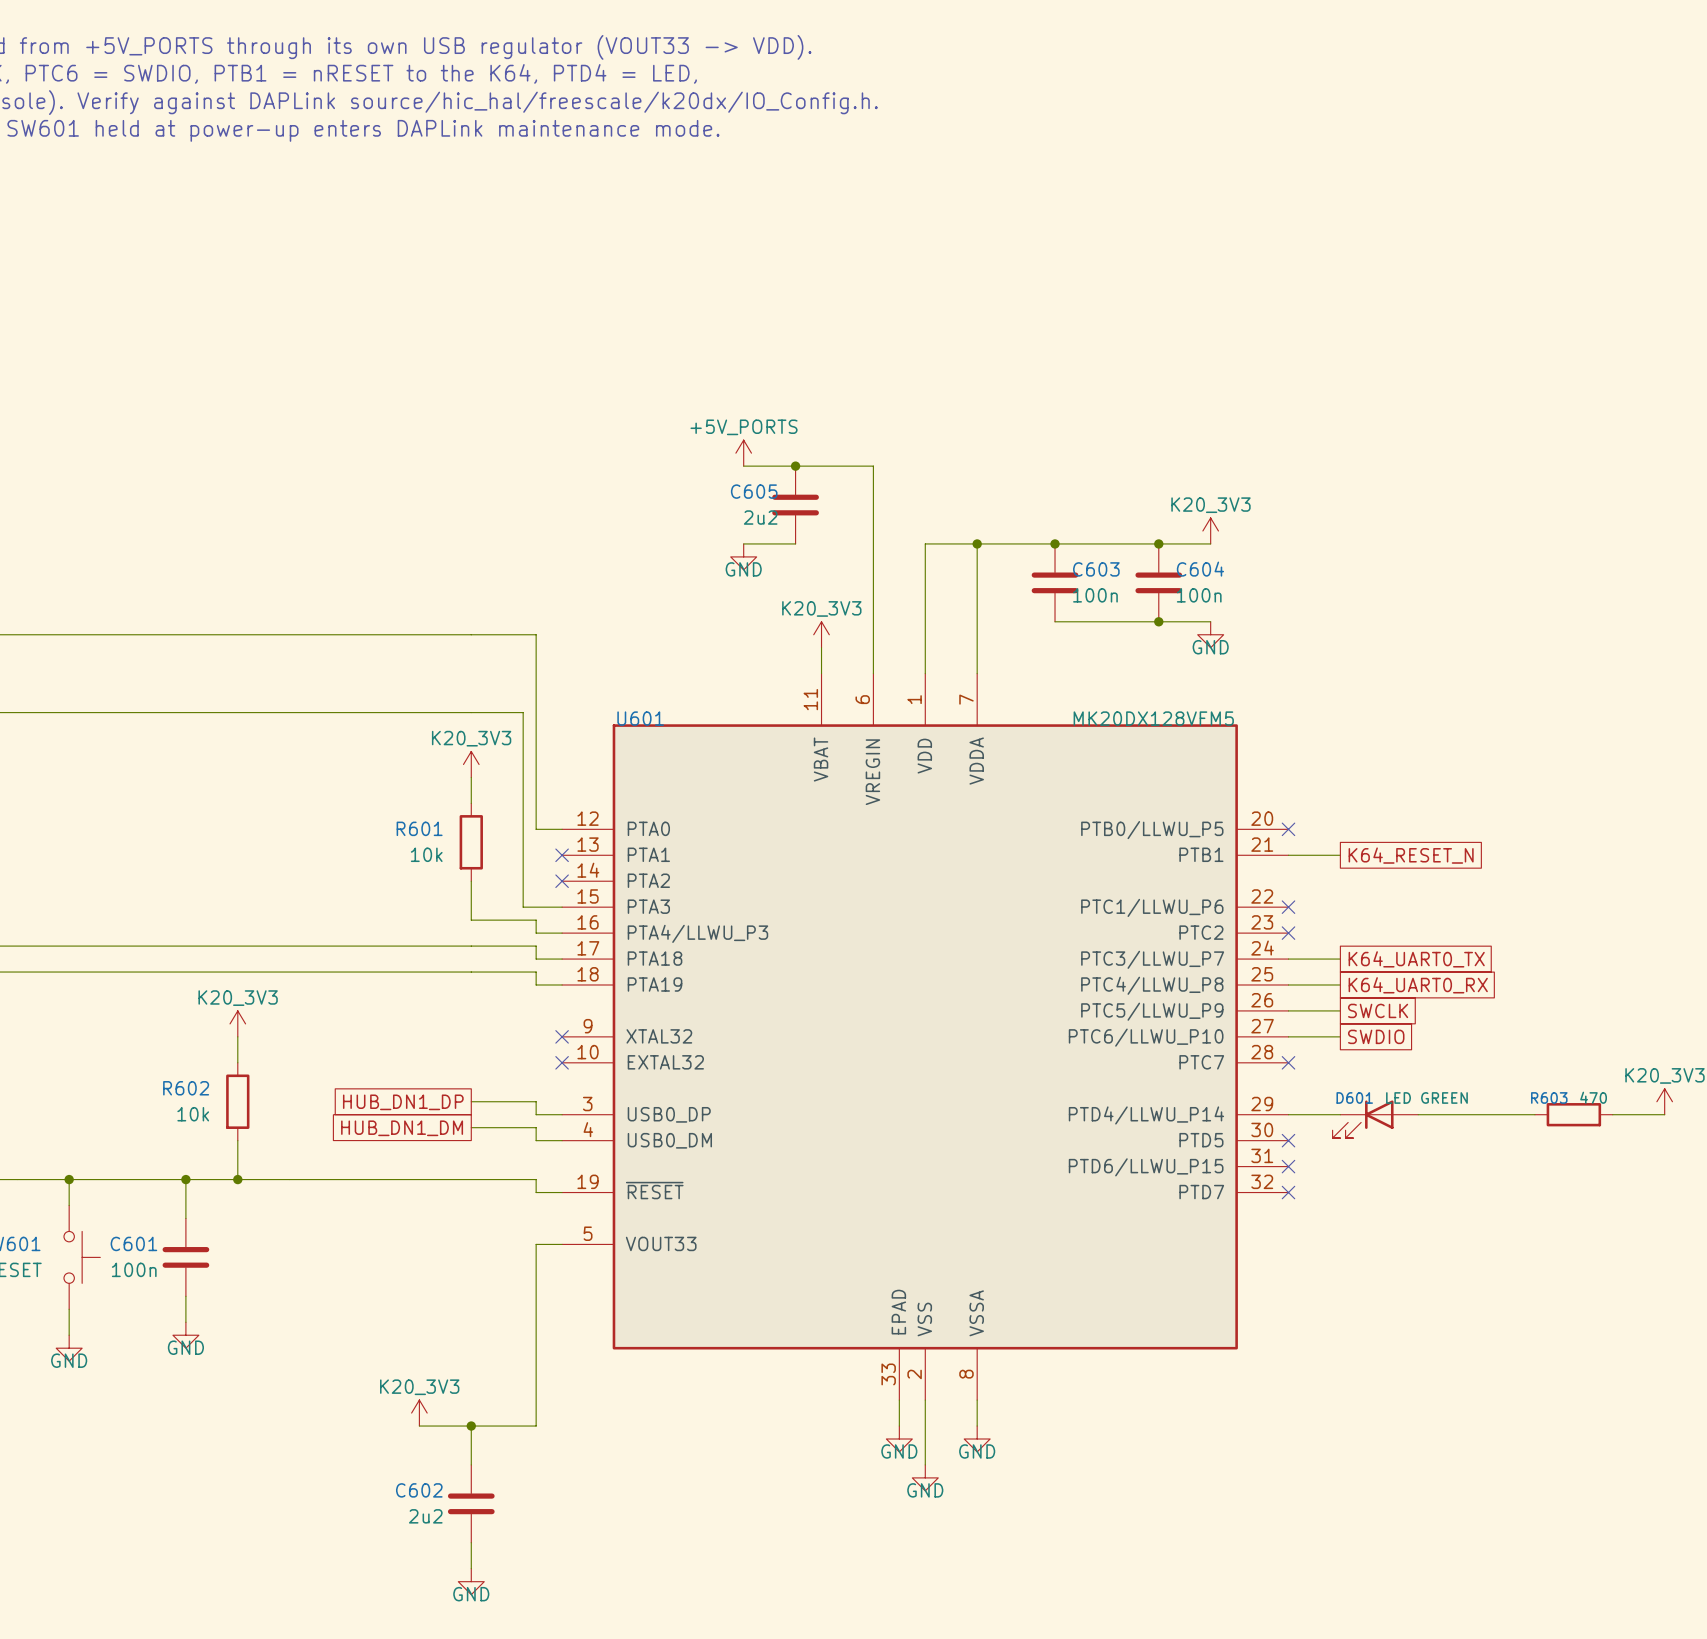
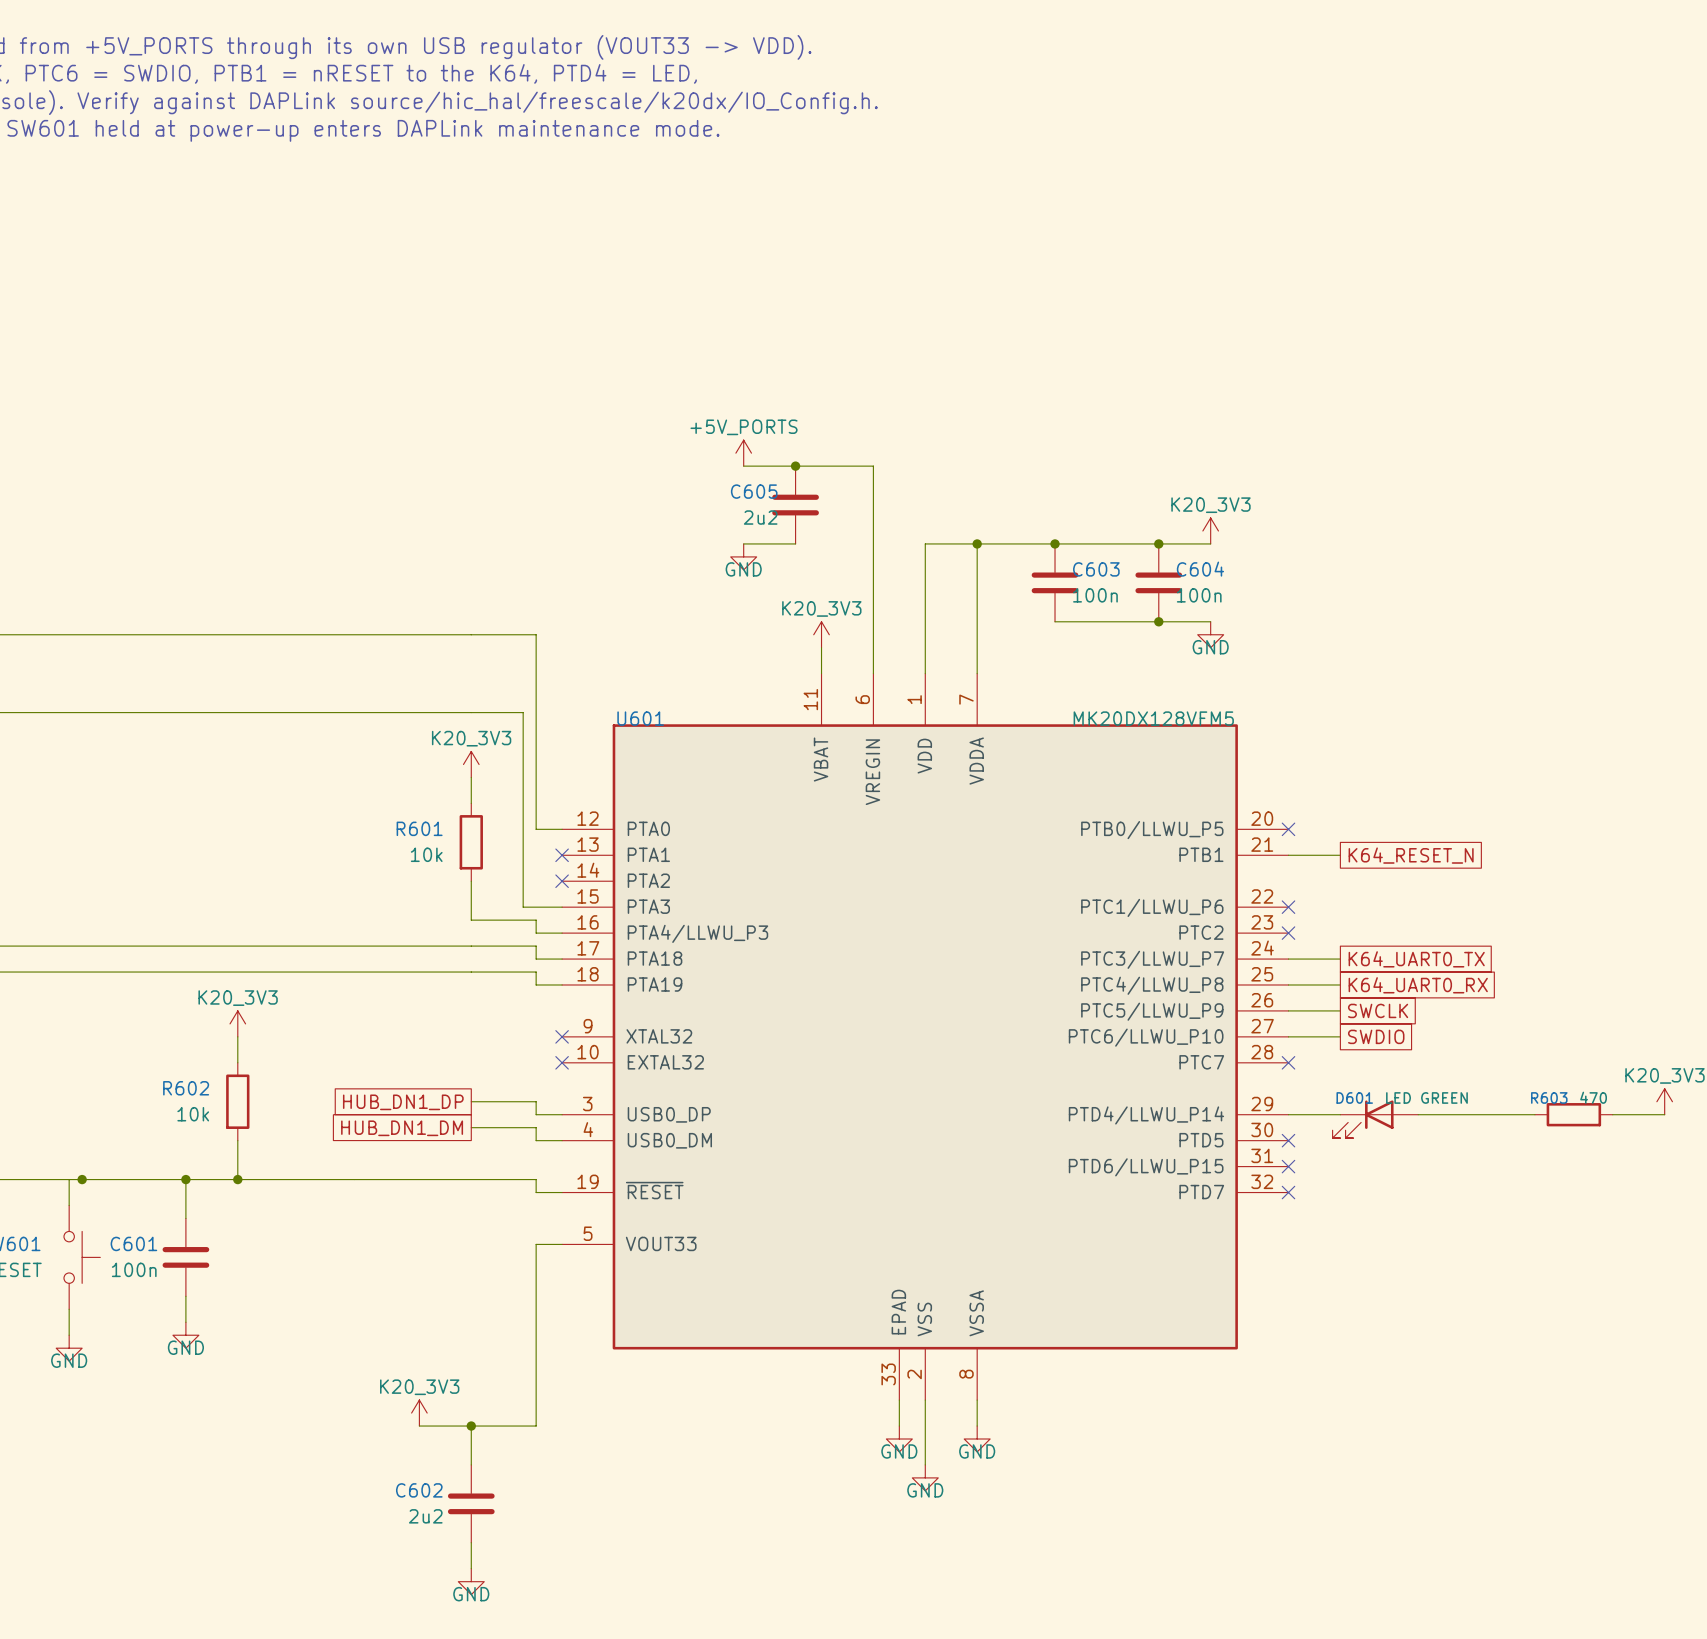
junction position: (69, 1179) -> (82, 1179)

